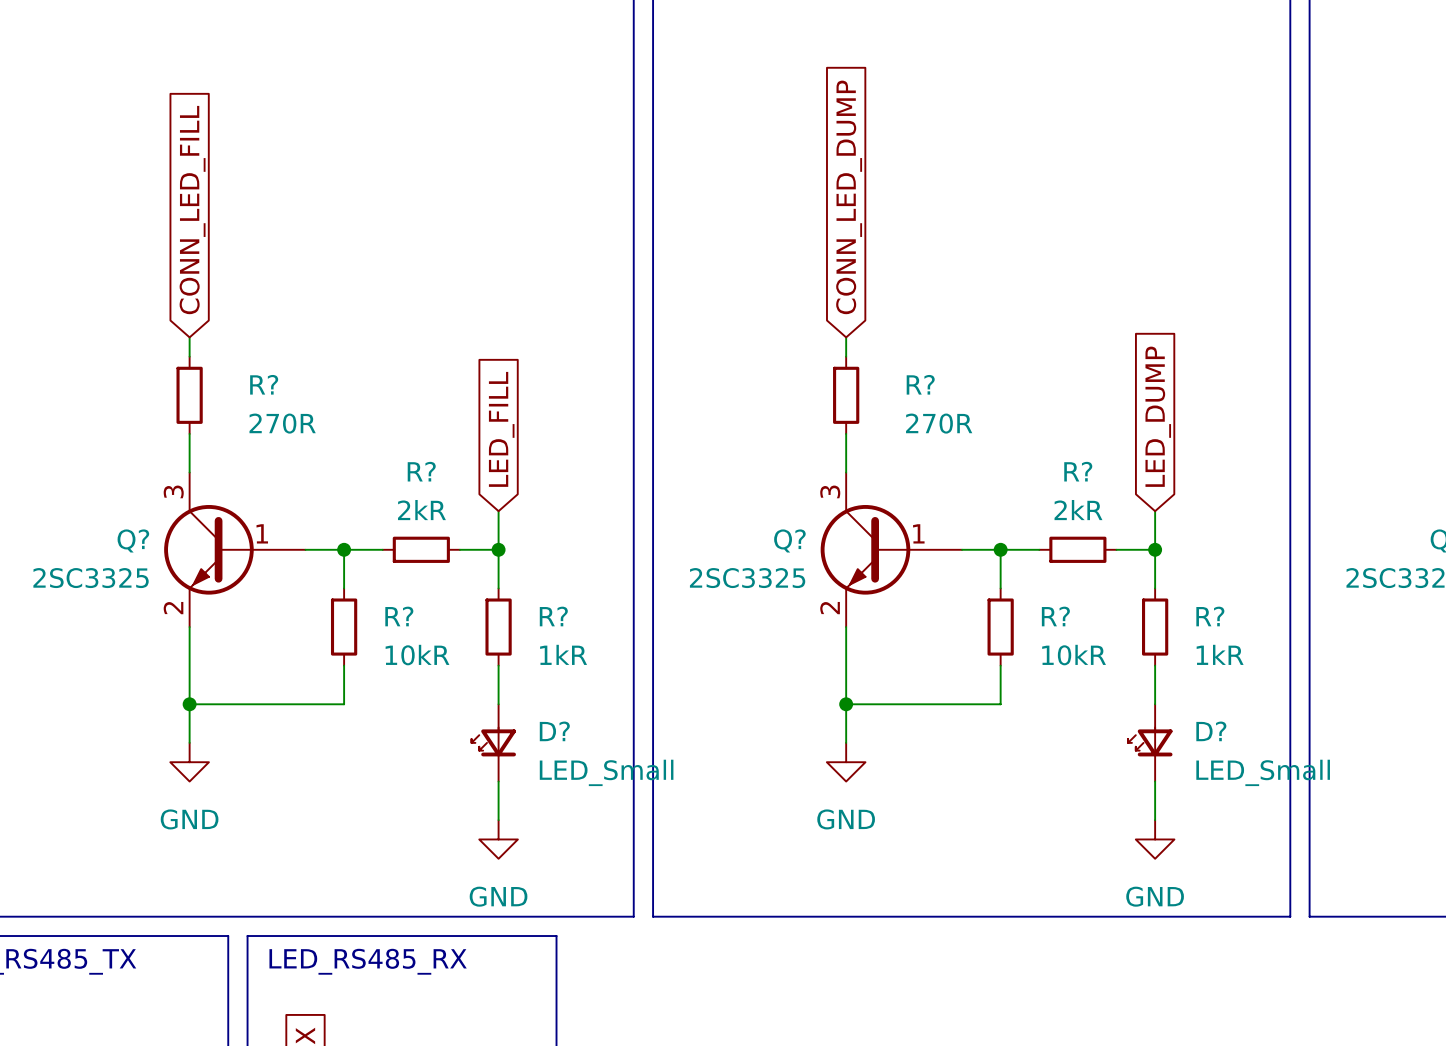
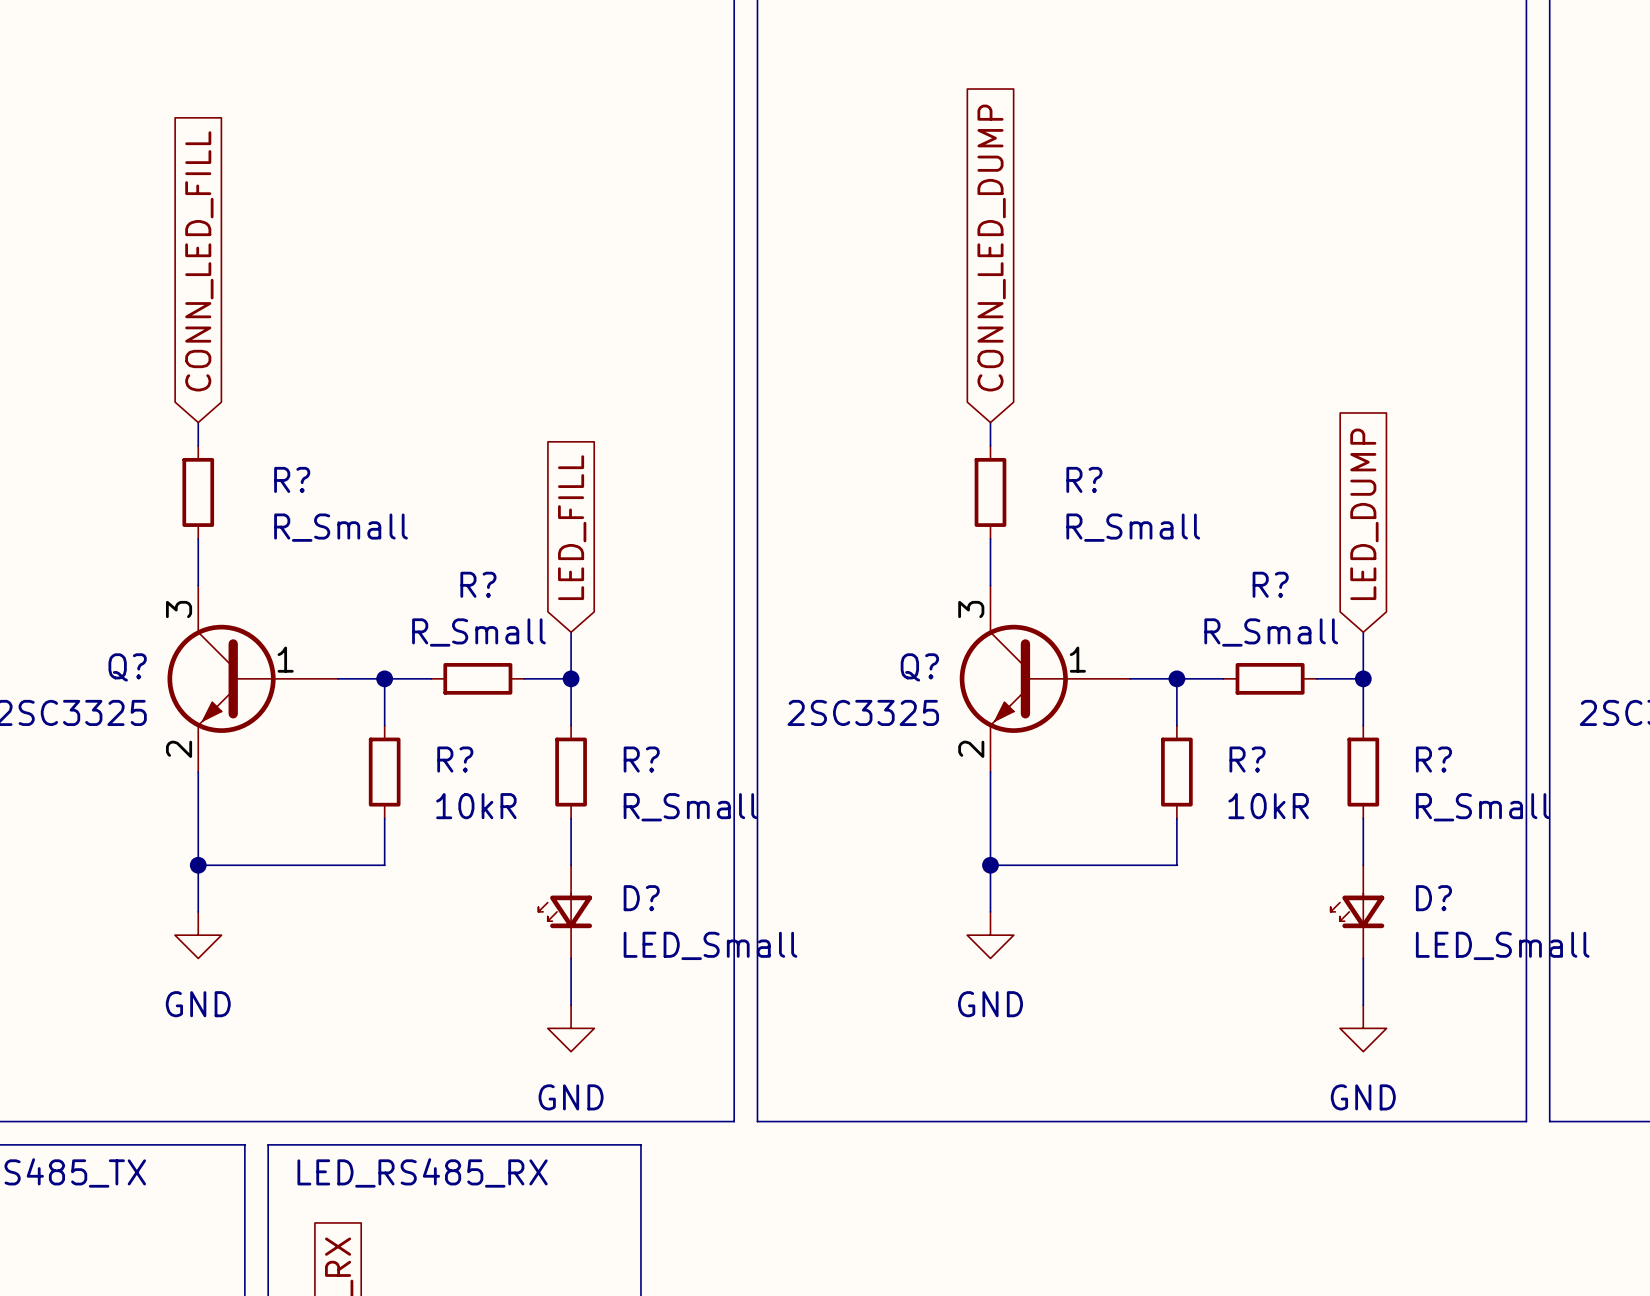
R? value: 270R (282, 423) -> R_Small (341, 527)
R? value: 270R (939, 423) -> R_Small (1133, 527)
R? value: 2kR (421, 510) -> R_Small (478, 632)
R? value: 2kR (1078, 510) -> R_Small (1271, 632)
R? value: 1kR (563, 654) -> R_Small (690, 807)
R? value: 1kR (1220, 654) -> R_Small (1482, 807)

